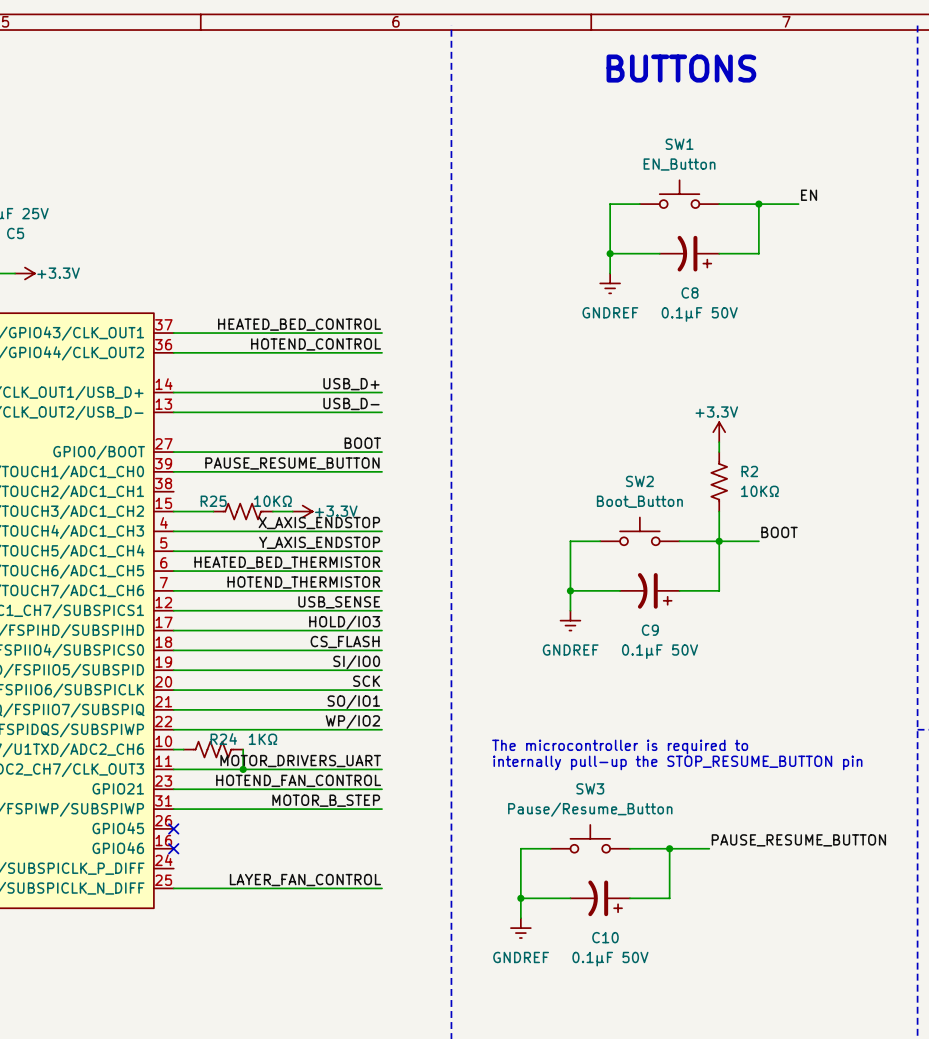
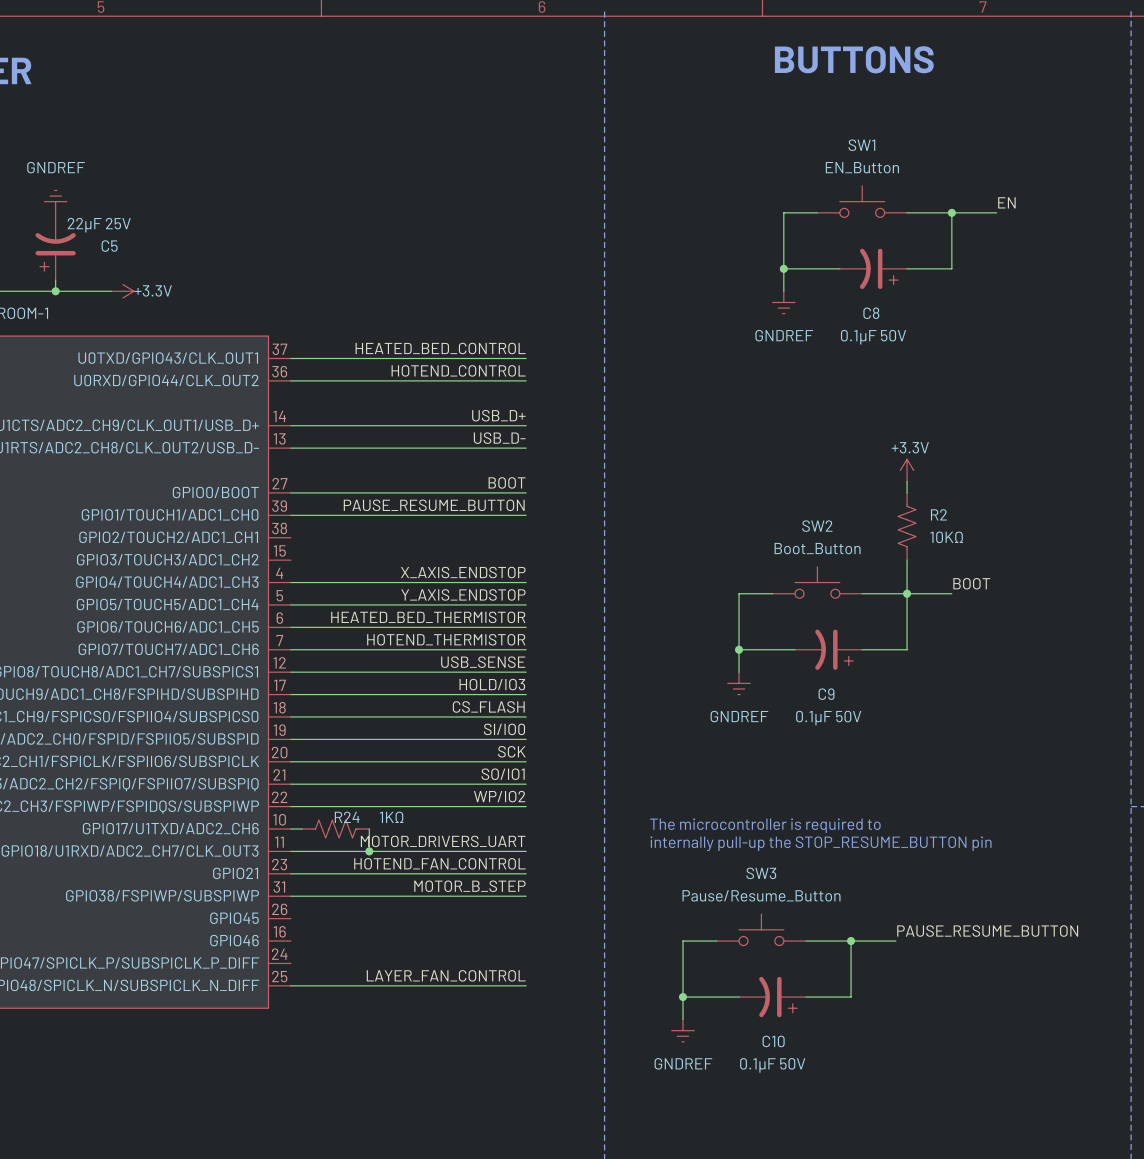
wire: (173, 511) (213, 511) -> none
R25: 10KΩ (243, 511) -> none
wire: (272, 511) (292, 511) -> none
power symbol: +3.3V (302, 511) -> none
no-connect mark: (173, 828) -> none
no-connect mark: (173, 848) -> none

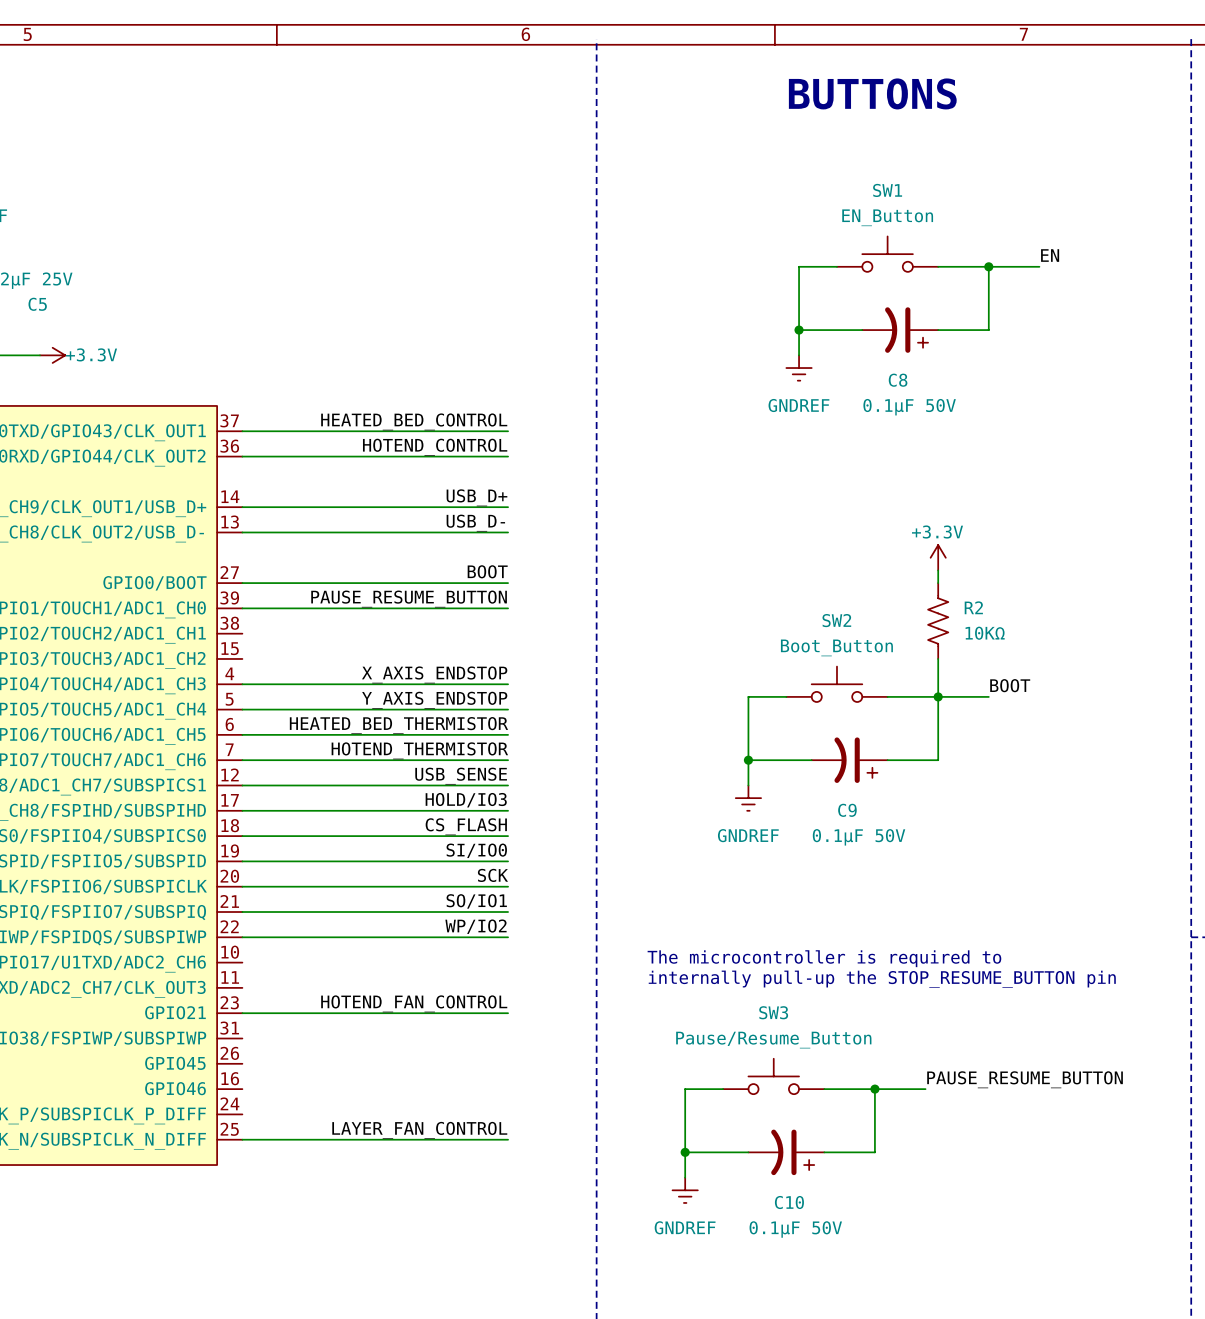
wire: (290, 829) (302, 829) -> none
R24: 1KΩ (335, 829) -> none
wire: (369, 829) (369, 851) -> none
label: MOTOR_DRIVERS_UART (443, 841) -> none
wire: (290, 851) (526, 851) -> none
junction: (369, 851) -> none
label: MOTOR_B_STEP (469, 886) -> none
wire: (290, 896) (526, 896) -> none

